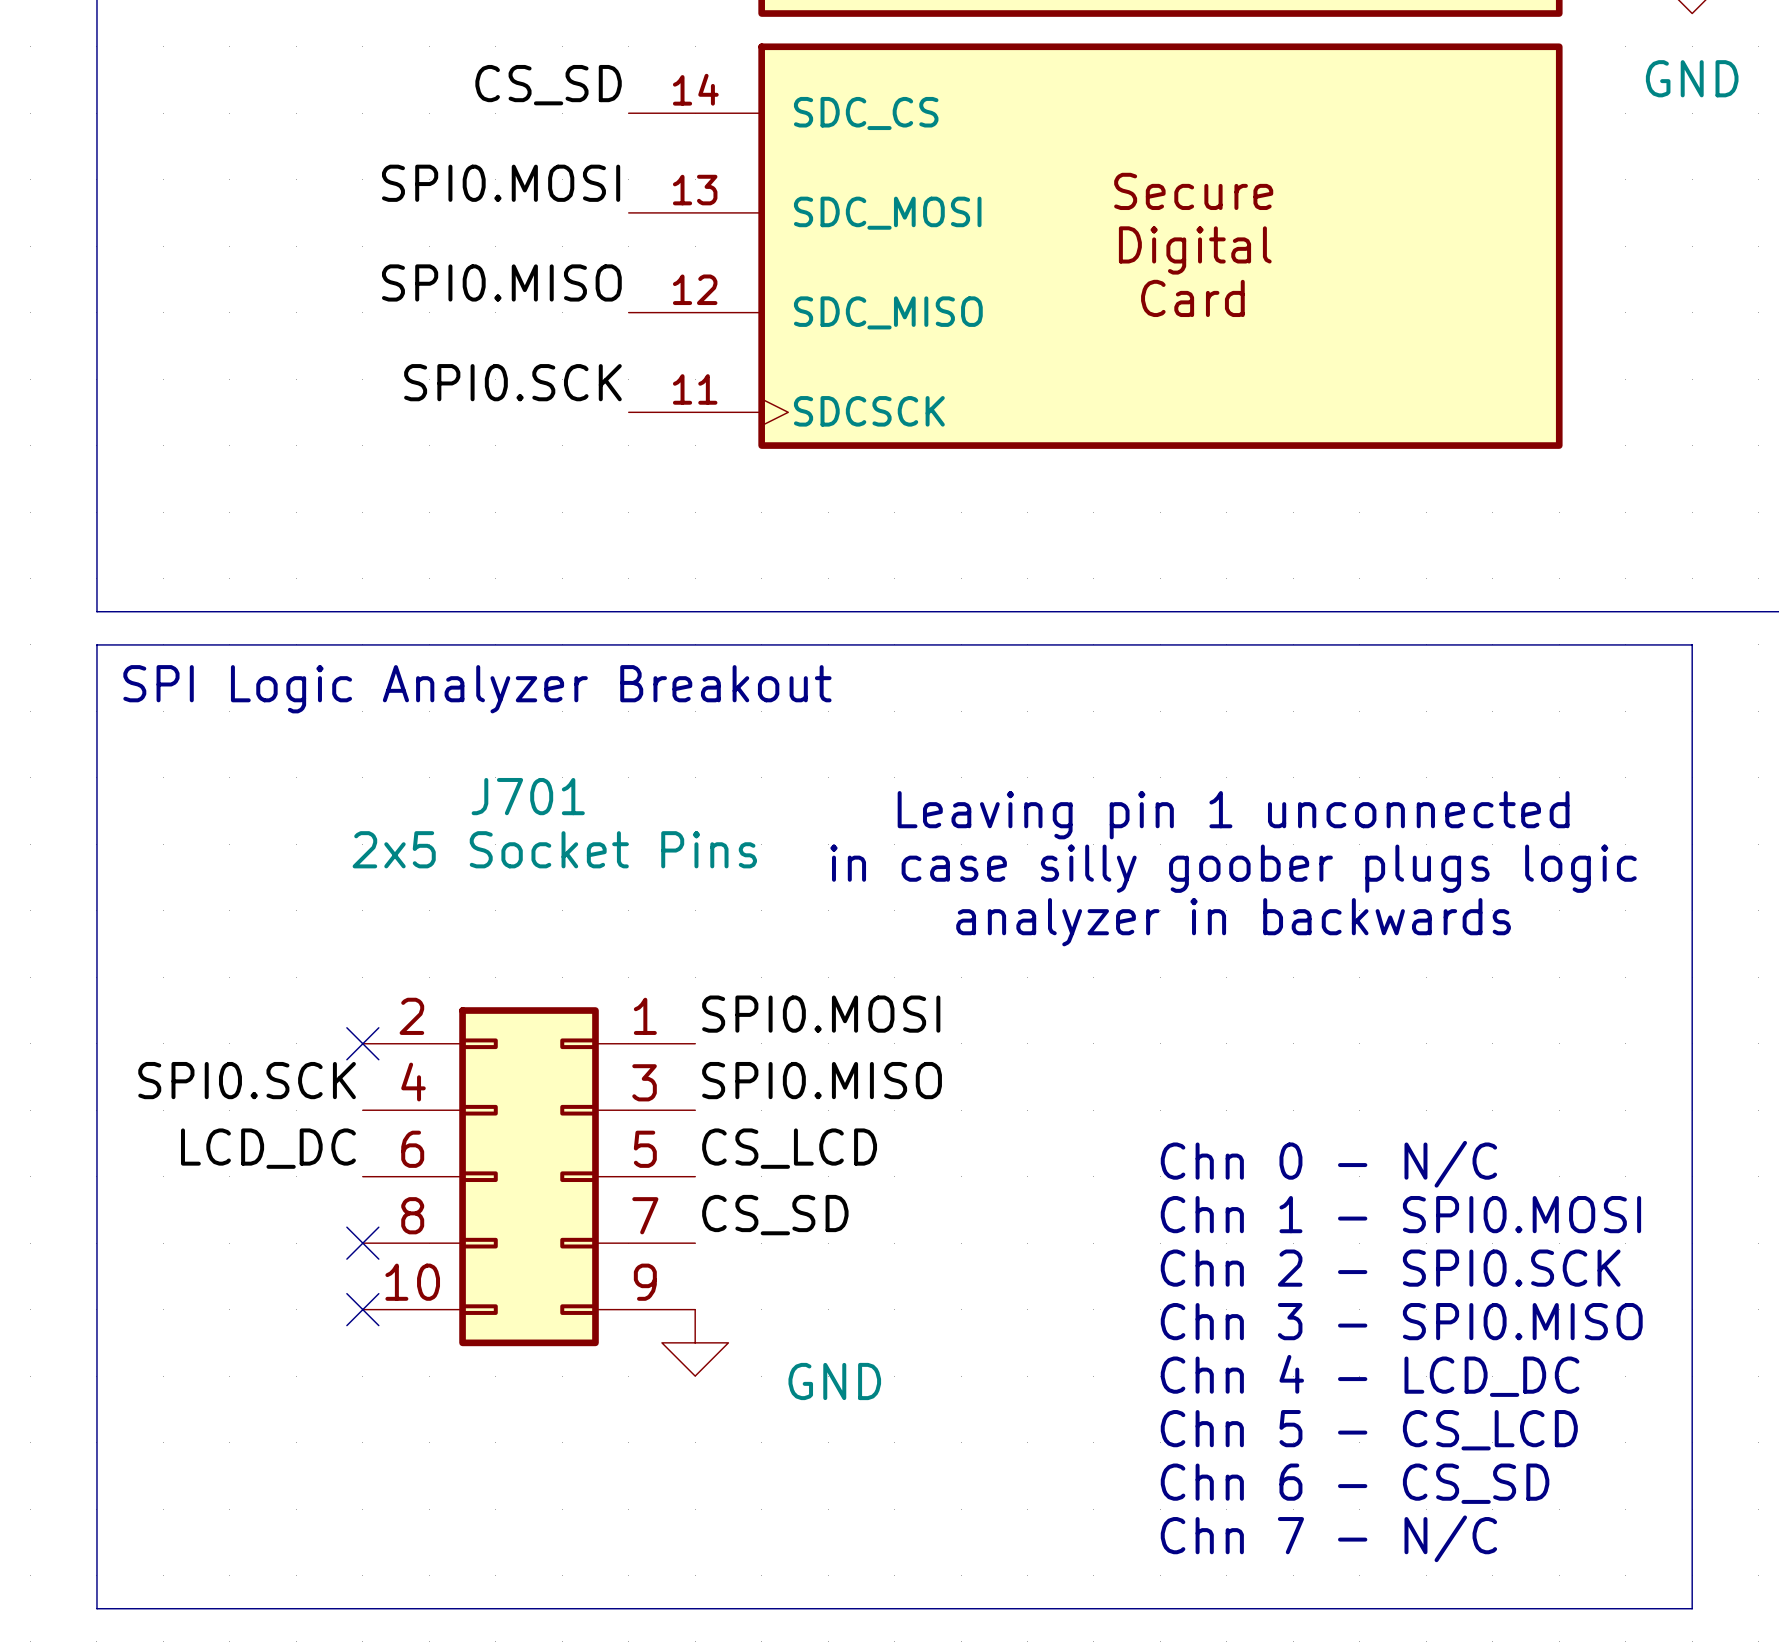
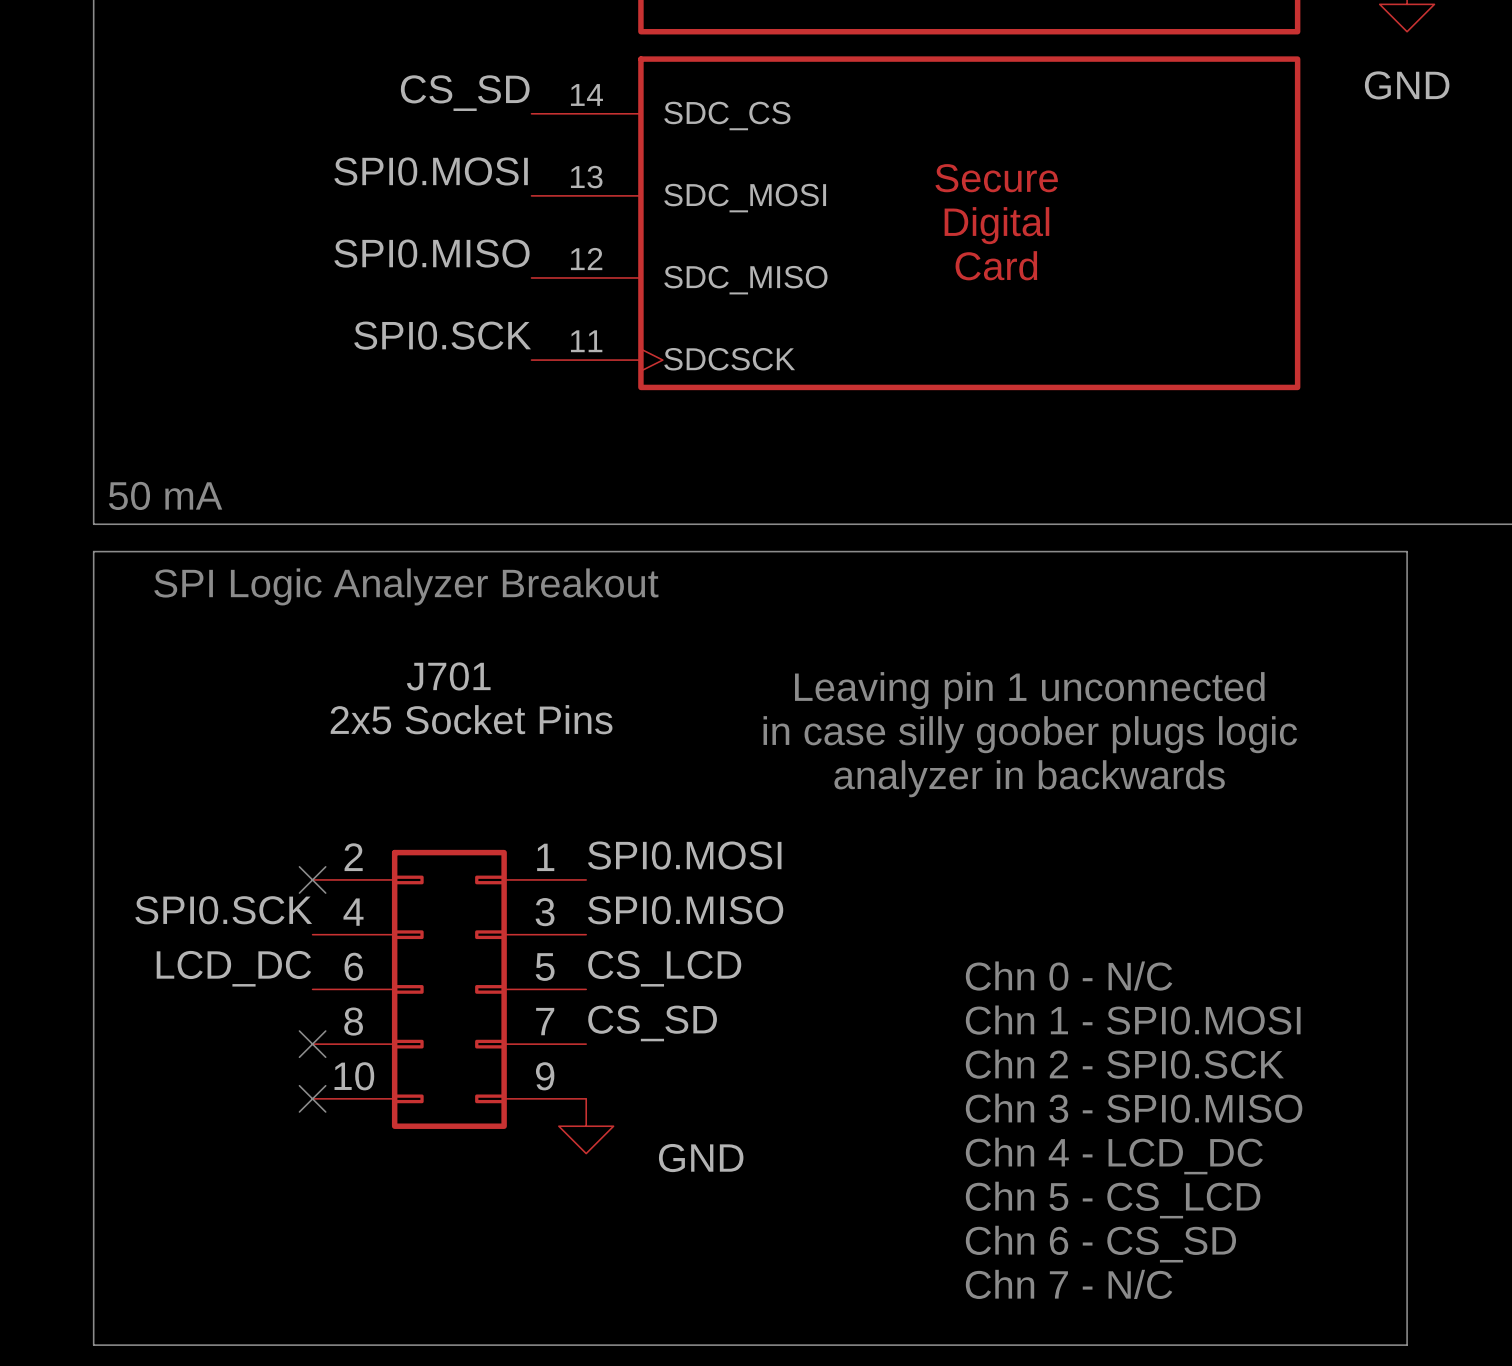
text: none -> 50 mA (165, 495)

